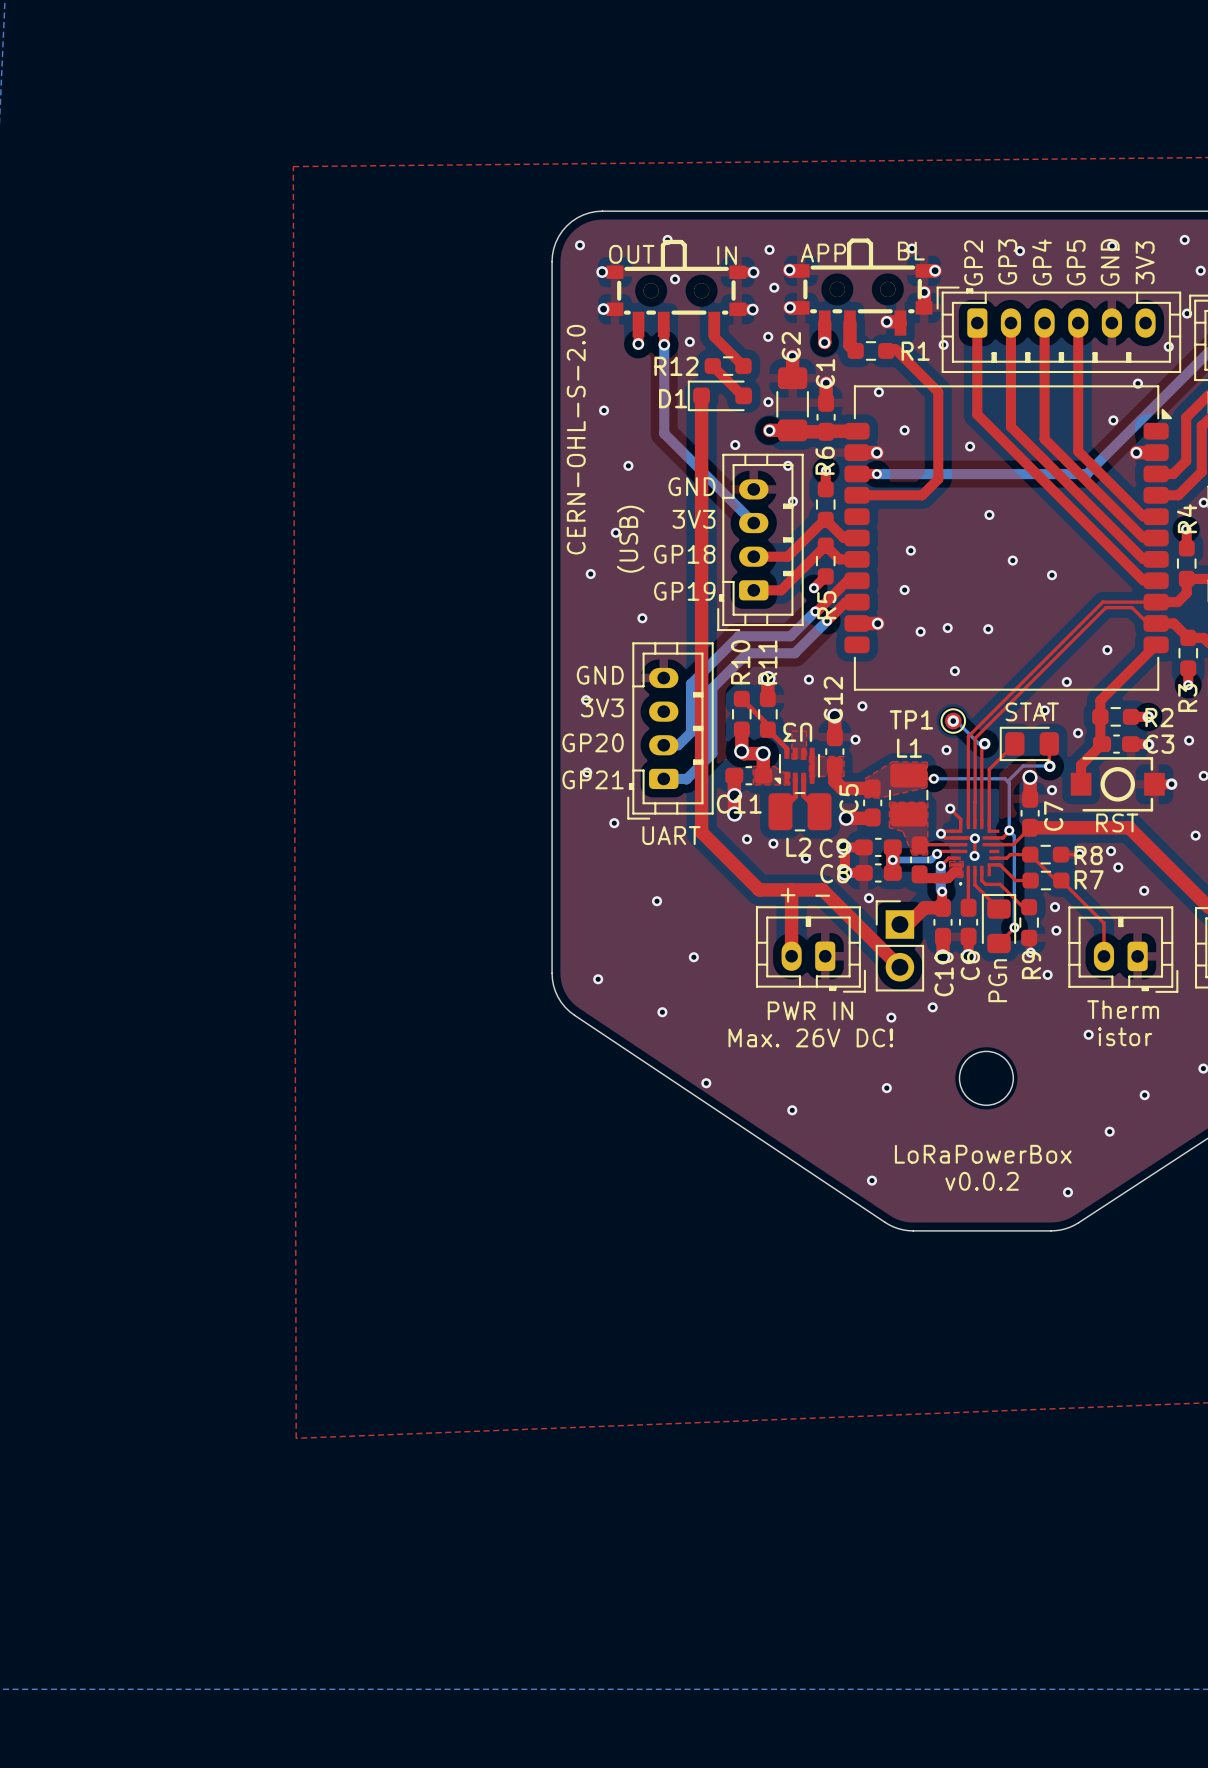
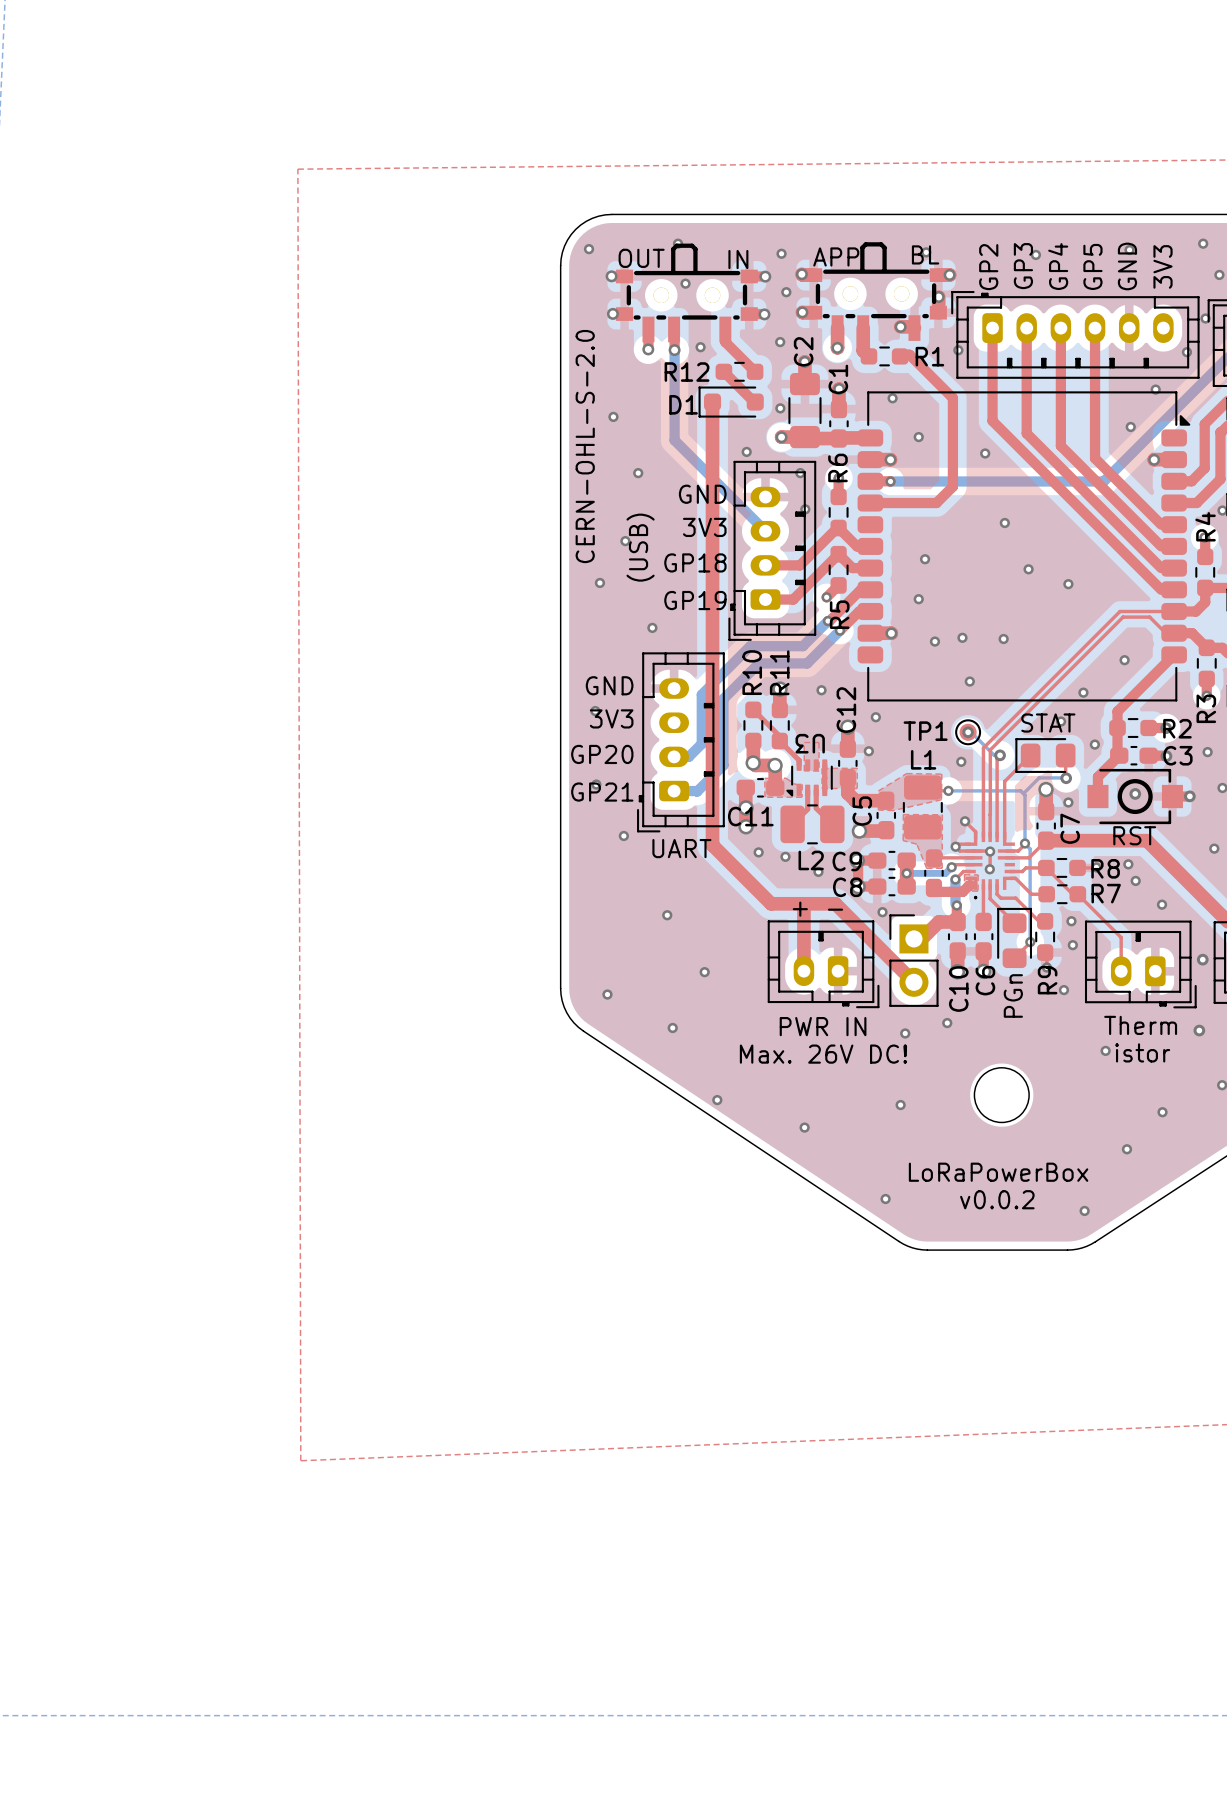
via: none -> (1135, 793)
via: none -> (1202, 959)
via: none -> (1199, 1030)

